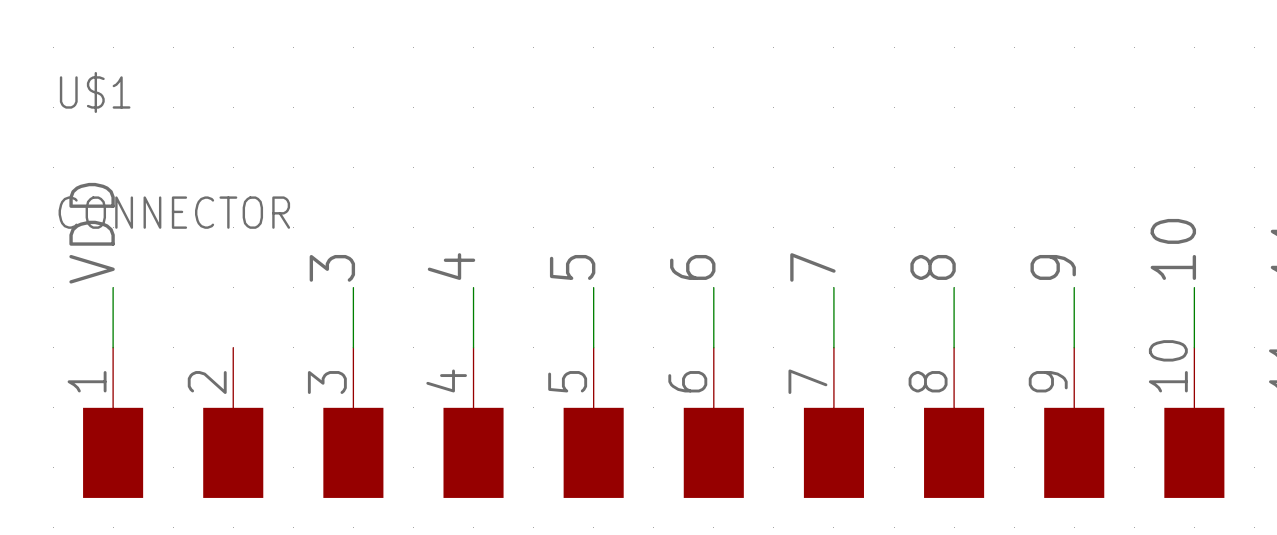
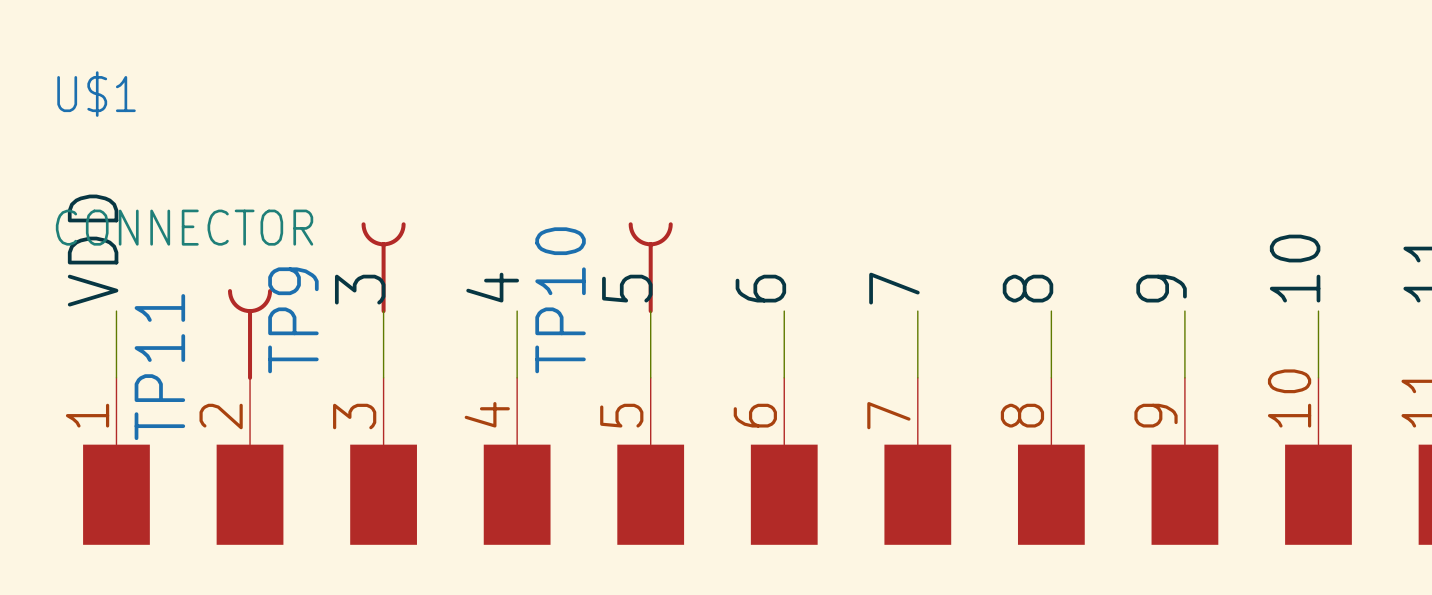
TP9: none -> (383, 267)
TP10: none -> (650, 267)
TP11: none -> (250, 334)

